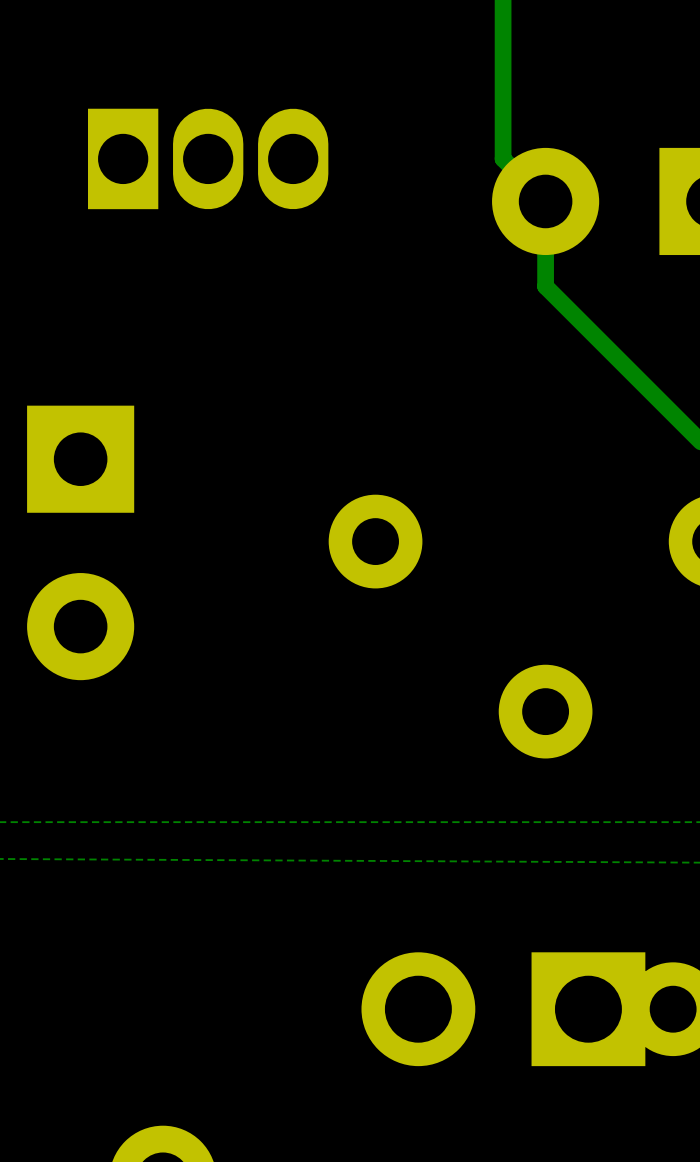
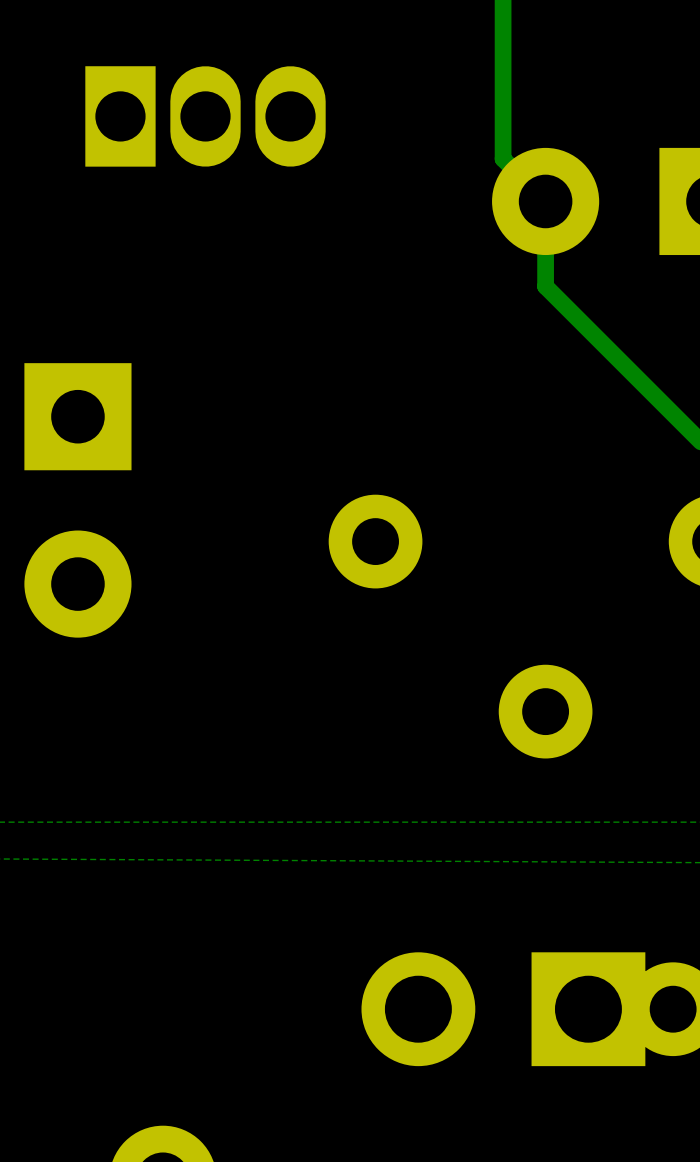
part position: (208, 158) -> (205, 116)
part position: (80, 542) -> (77, 500)

